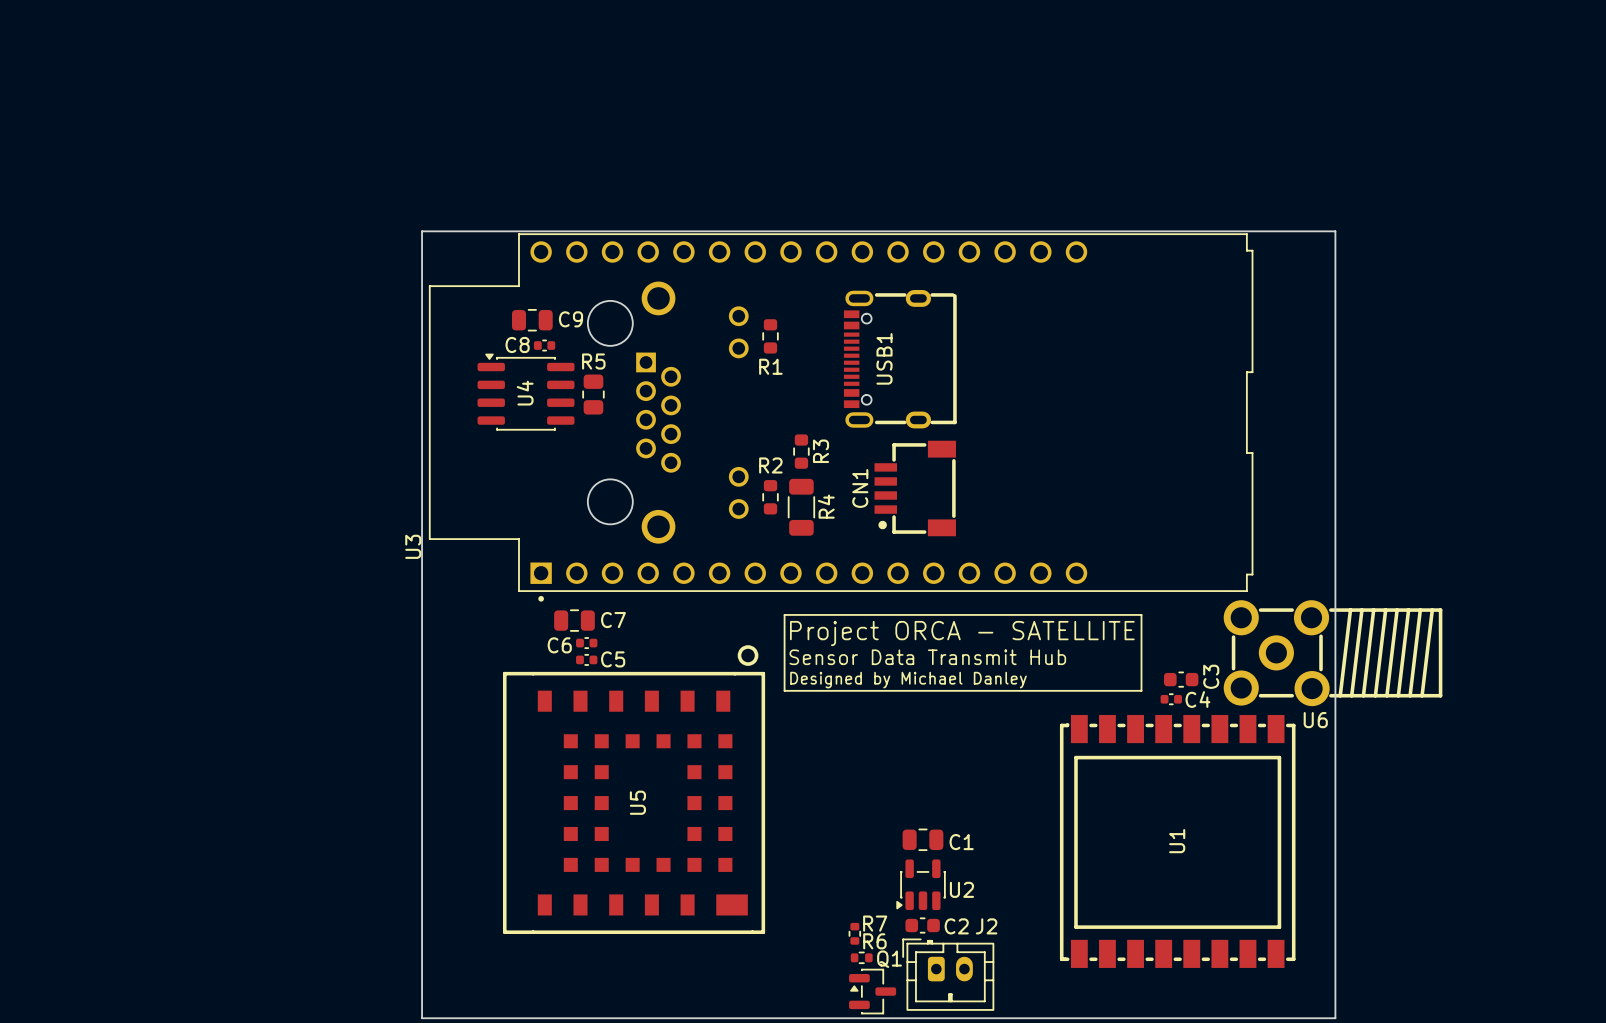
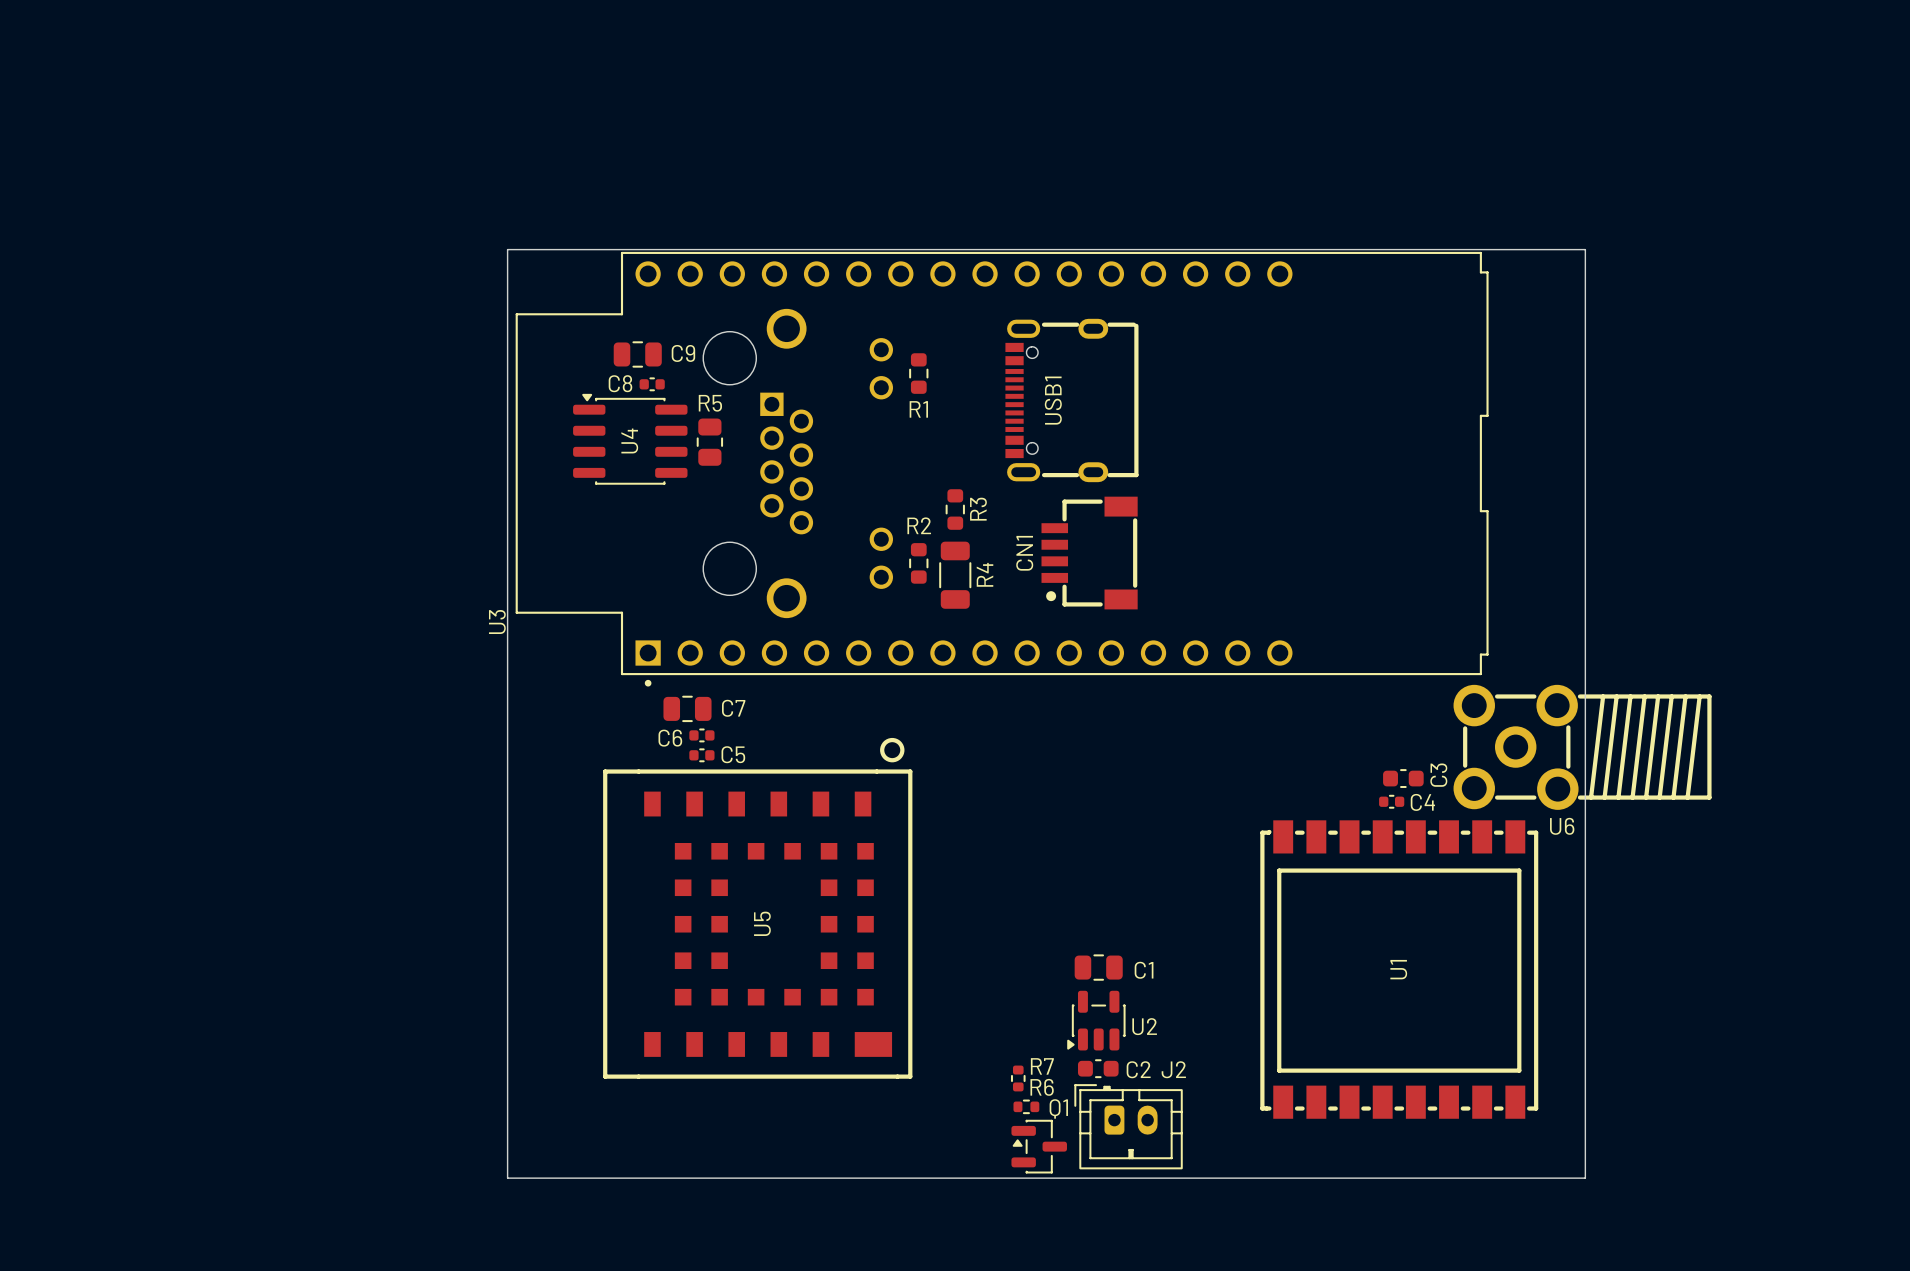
line: (784, 614) (1141, 614) (1141, 690) (784, 690) (784, 614) -> none
text: Project ORCA - SATELLITE (962, 633) -> none
text: Sensor Data Transmit Hub (927, 657) -> none
text: Designed by Michael Danley (908, 680) -> none

